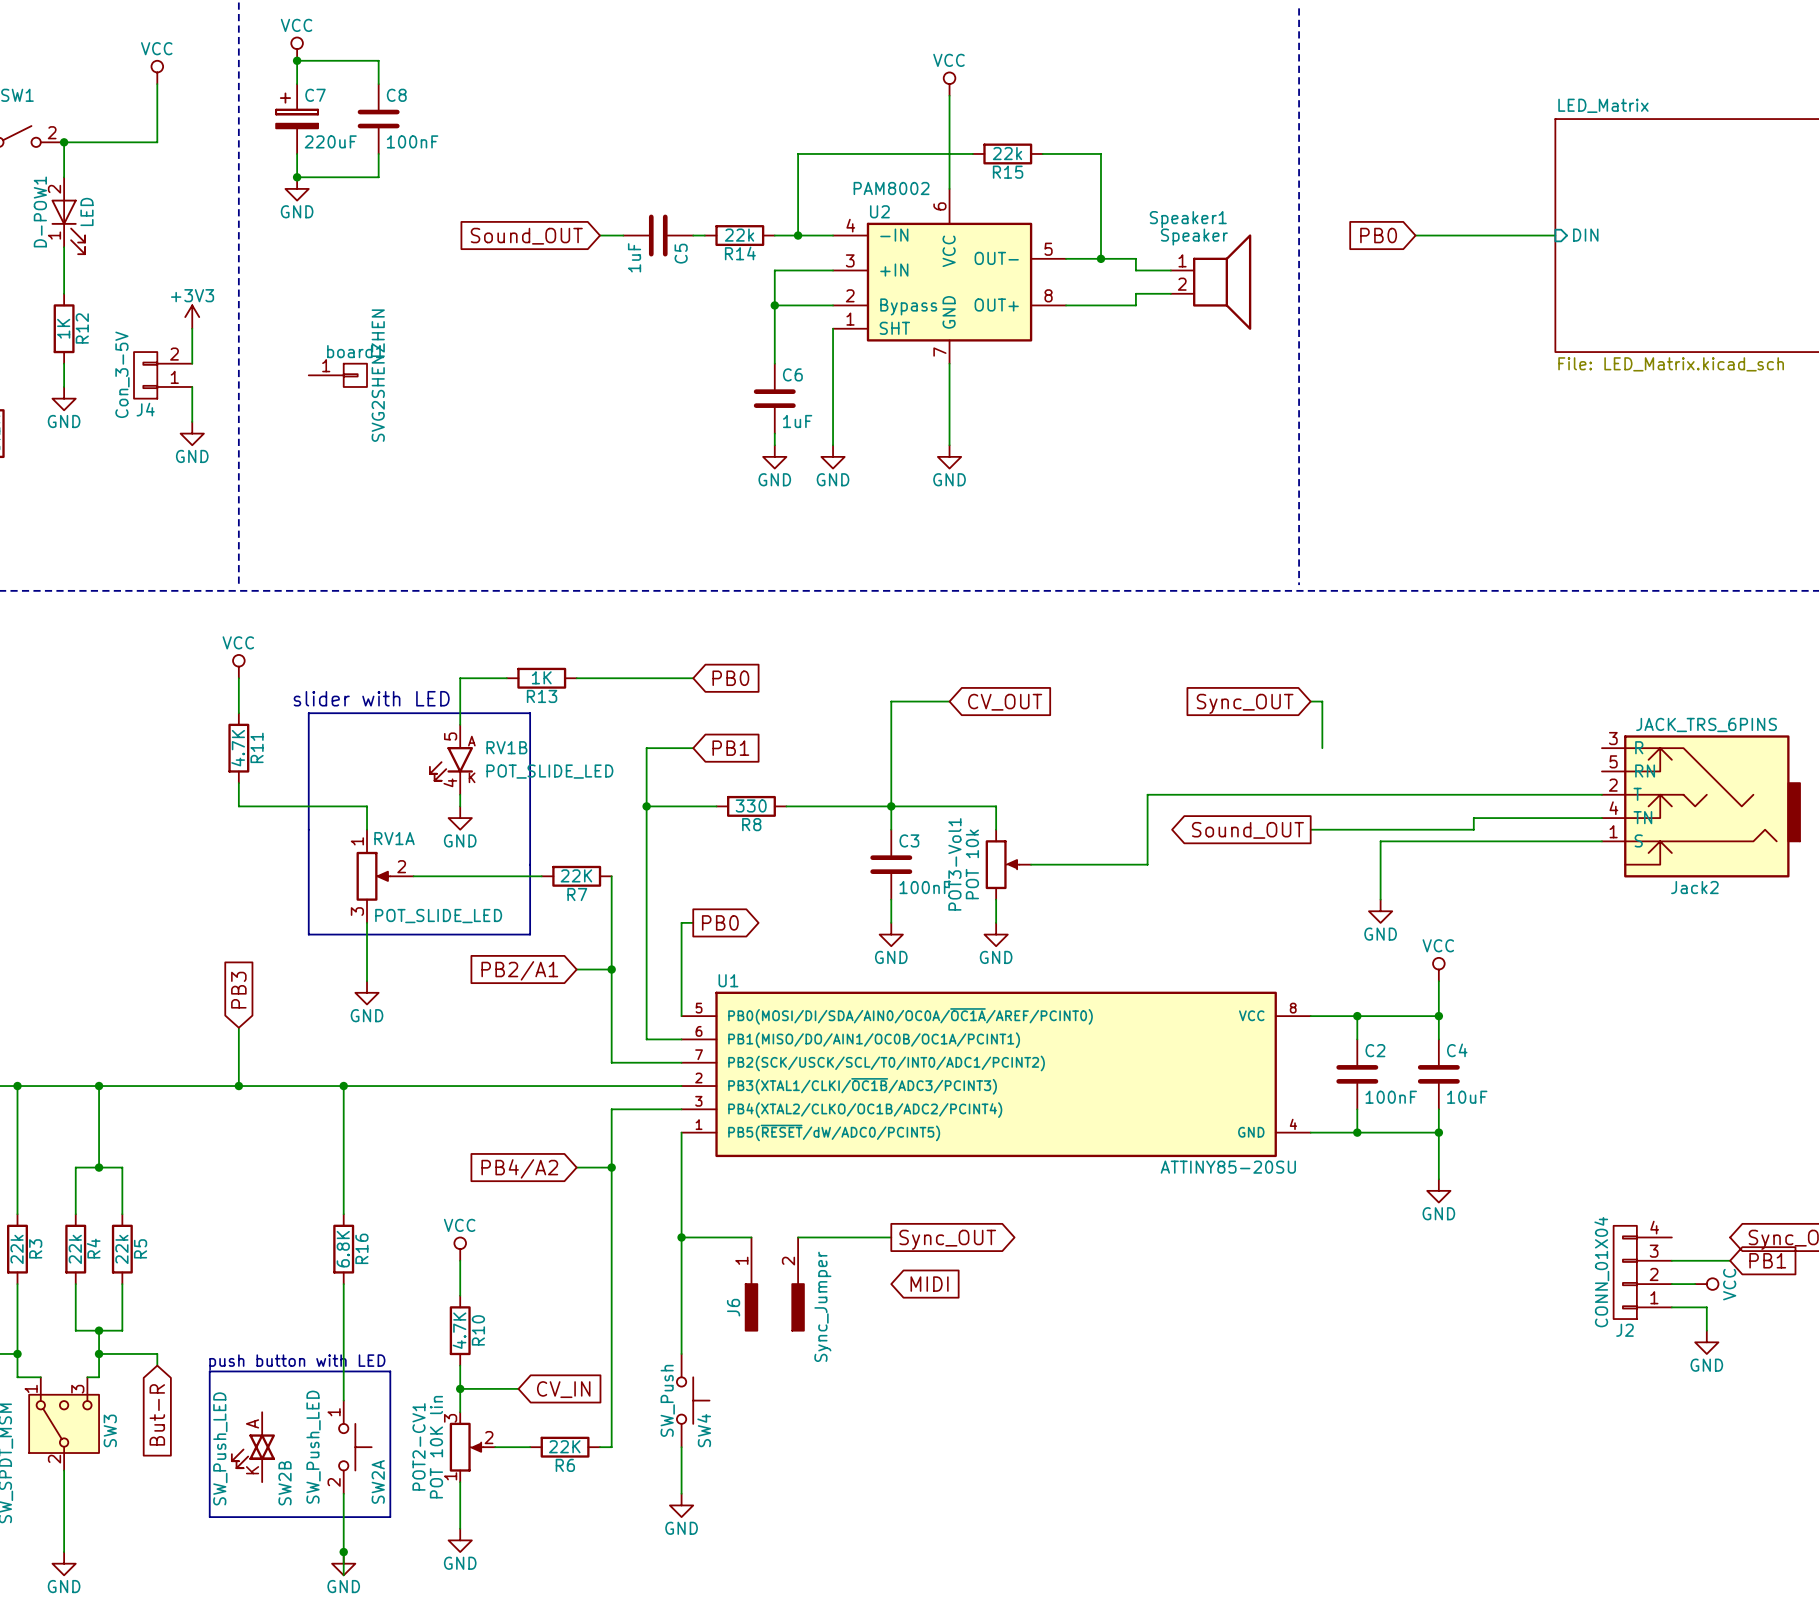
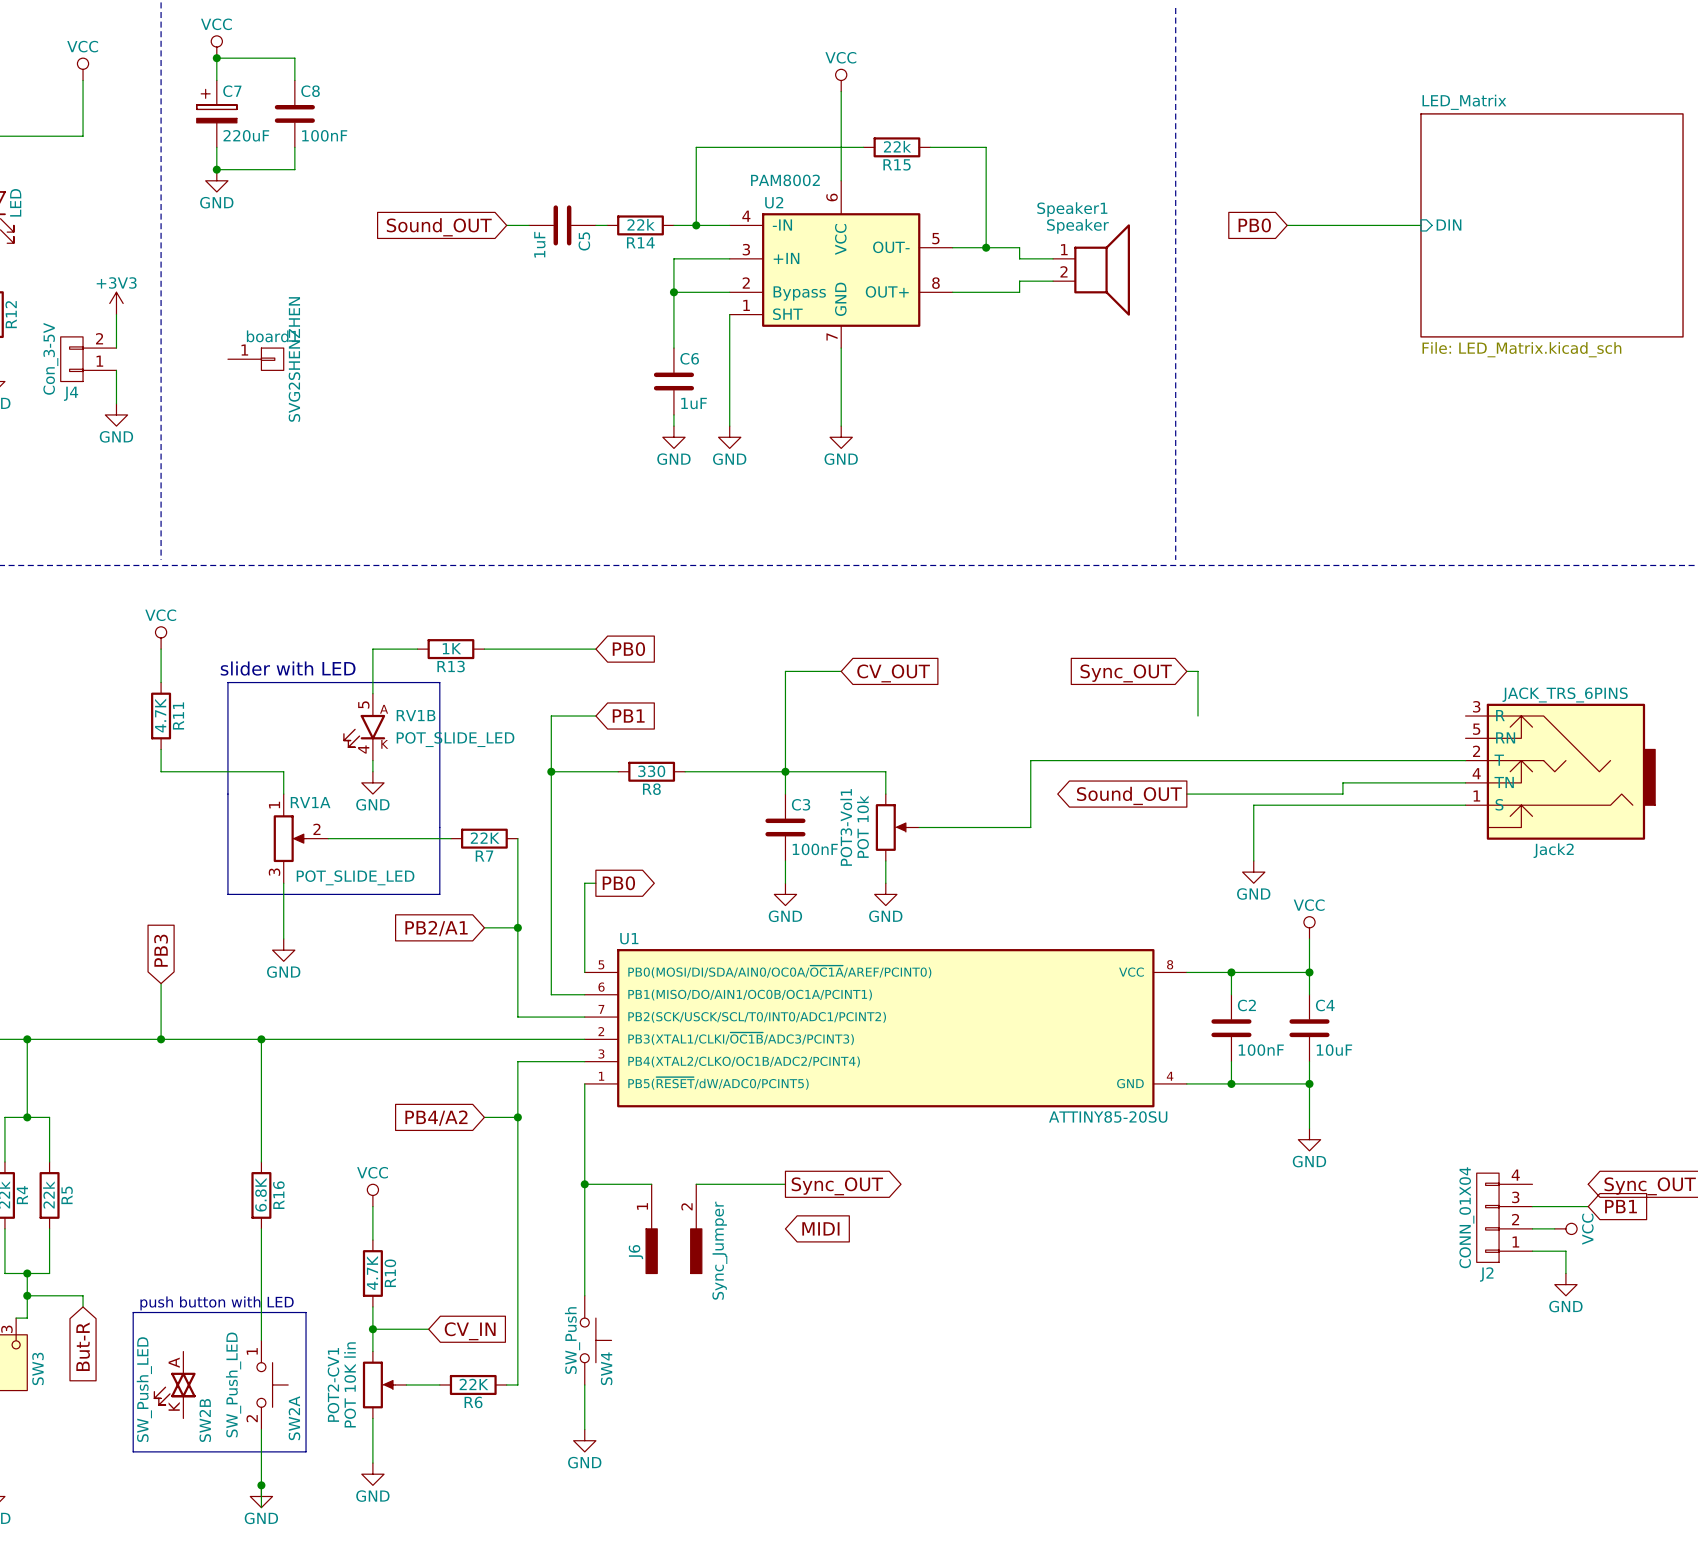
POT2-CV1 symbol: [449, 1412, 496, 1483] -> [362, 1351, 407, 1419]

